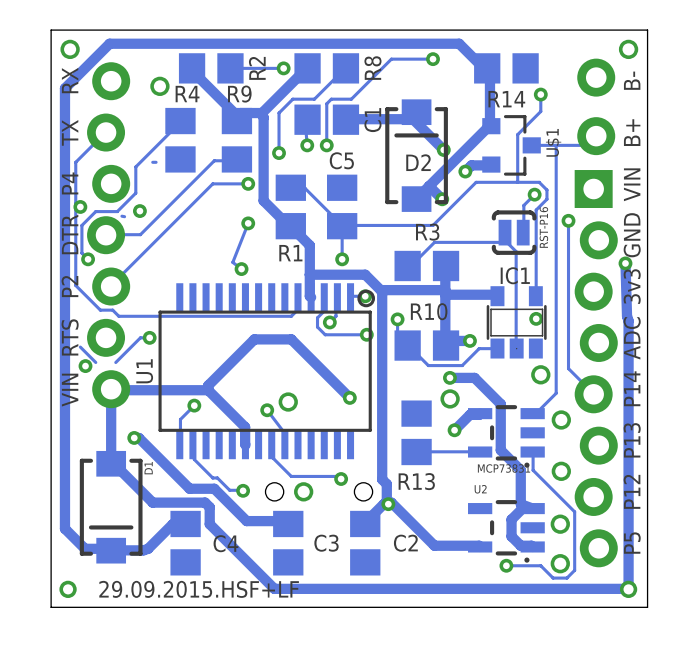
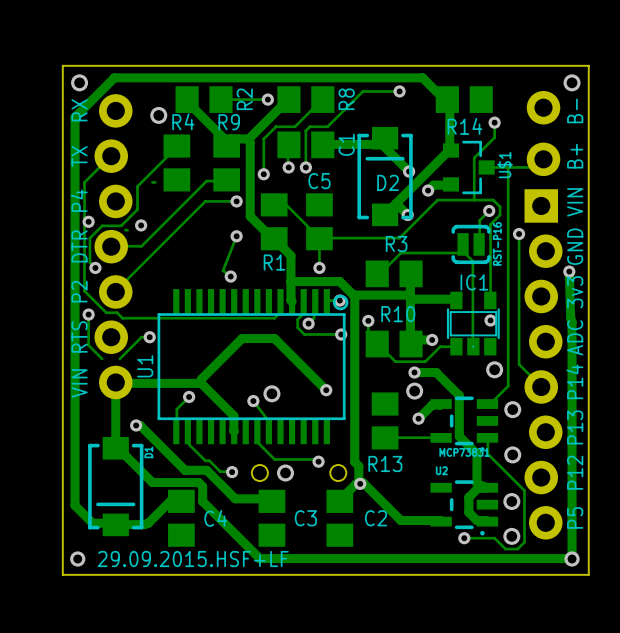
track: none -> (88, 314) (88, 345)
via position: (85, 366) -> (88, 314)

